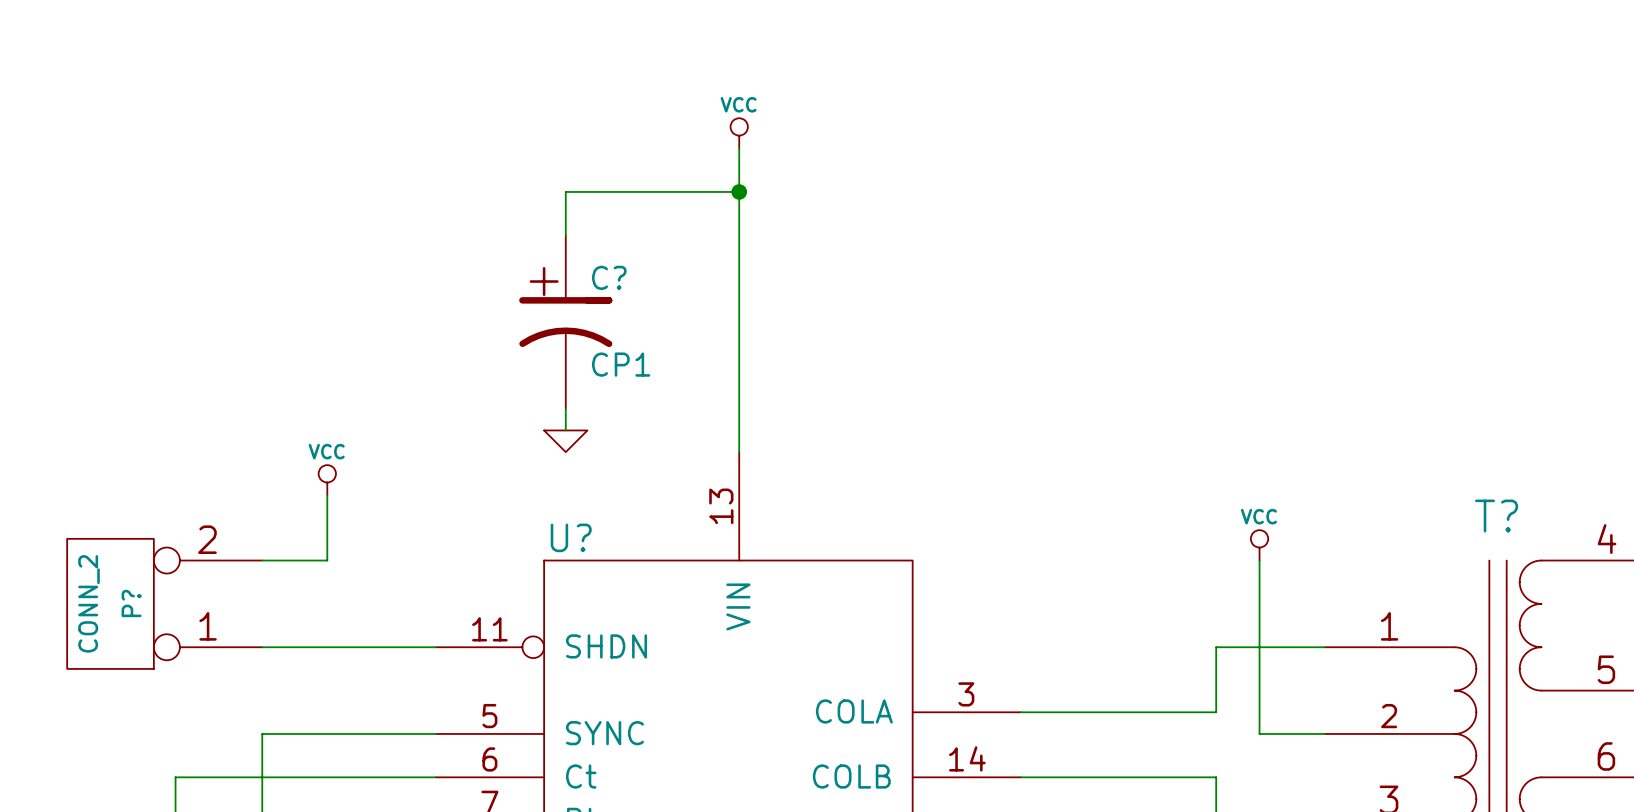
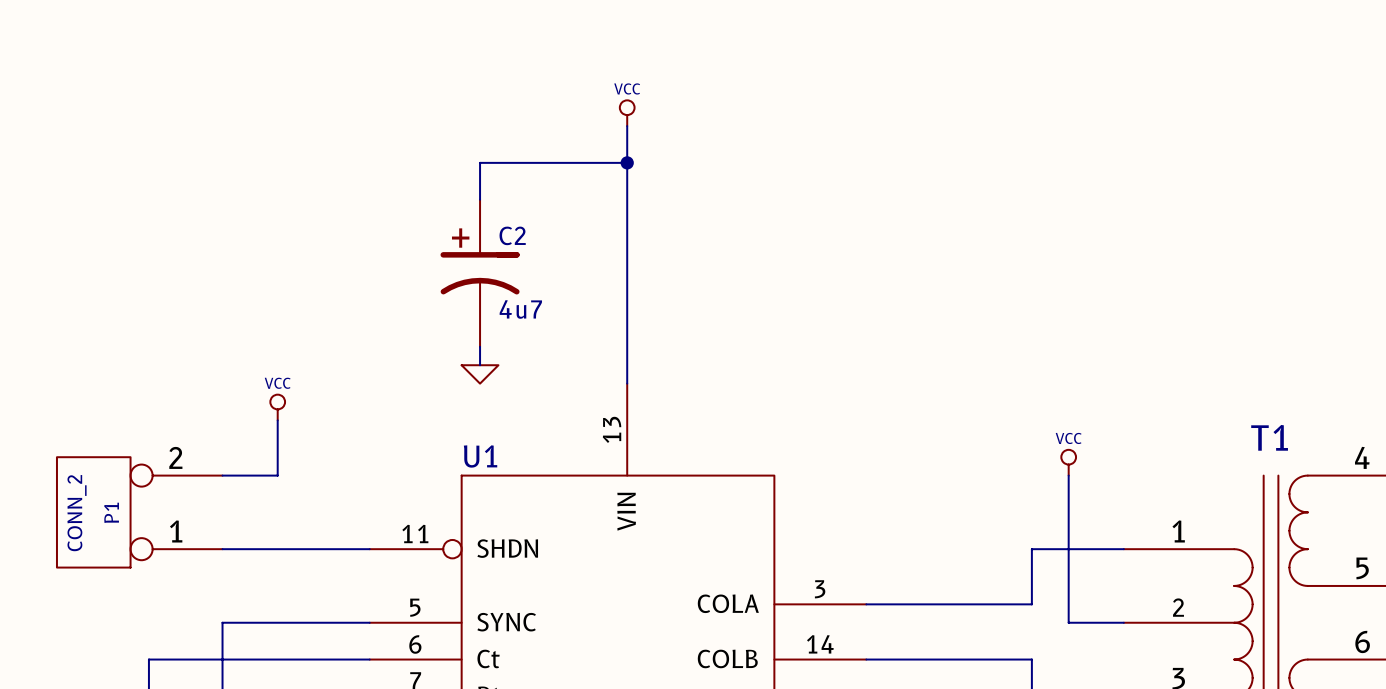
C? name: C? (609, 277) -> C2 (512, 235)
C? value: CP1 (621, 364) -> 4u7 (520, 309)
T? name: T? (1496, 516) -> T1 (1269, 437)
U? name: U? (571, 537) -> U1 (480, 456)
P? name: P? (131, 603) -> P1 (111, 512)

